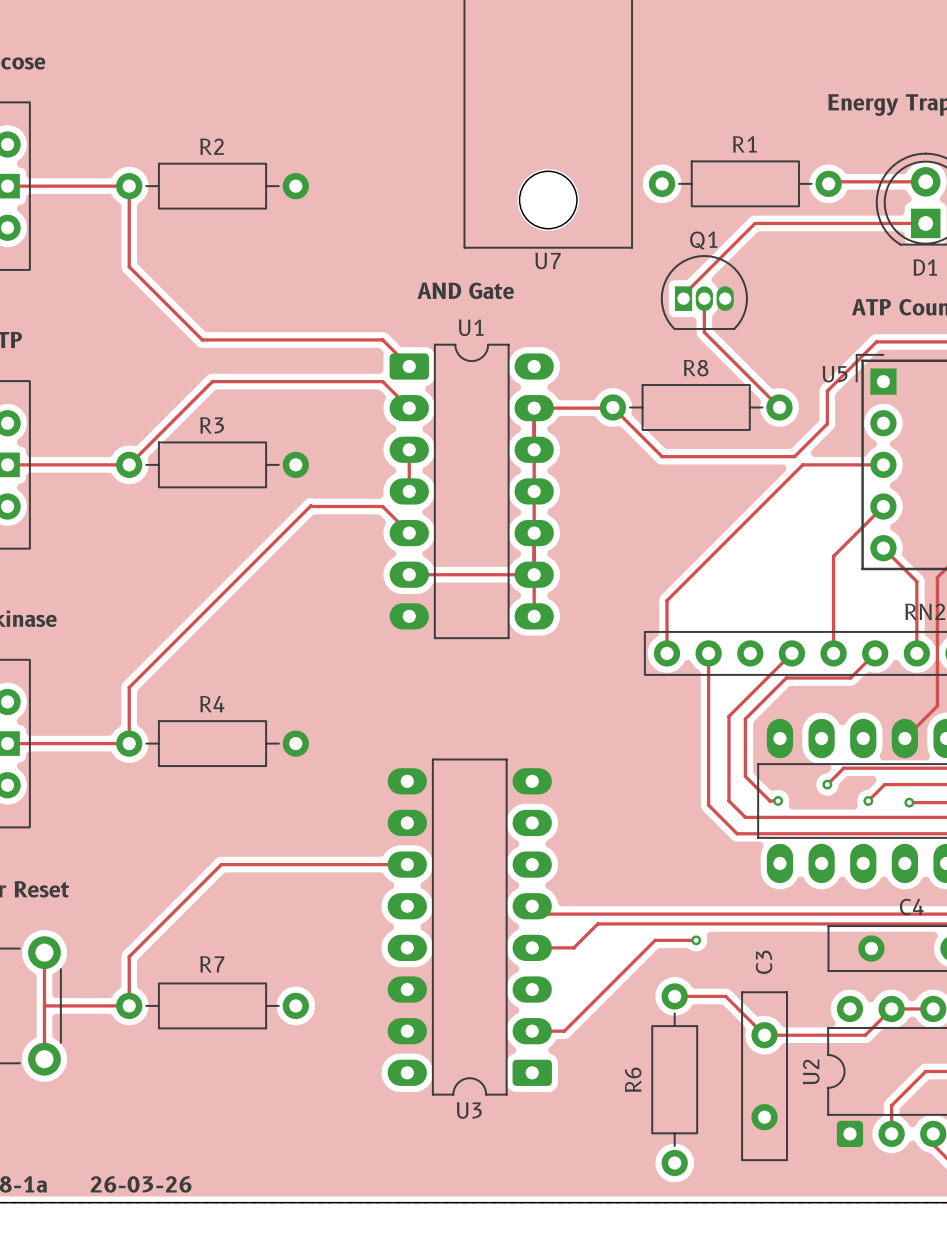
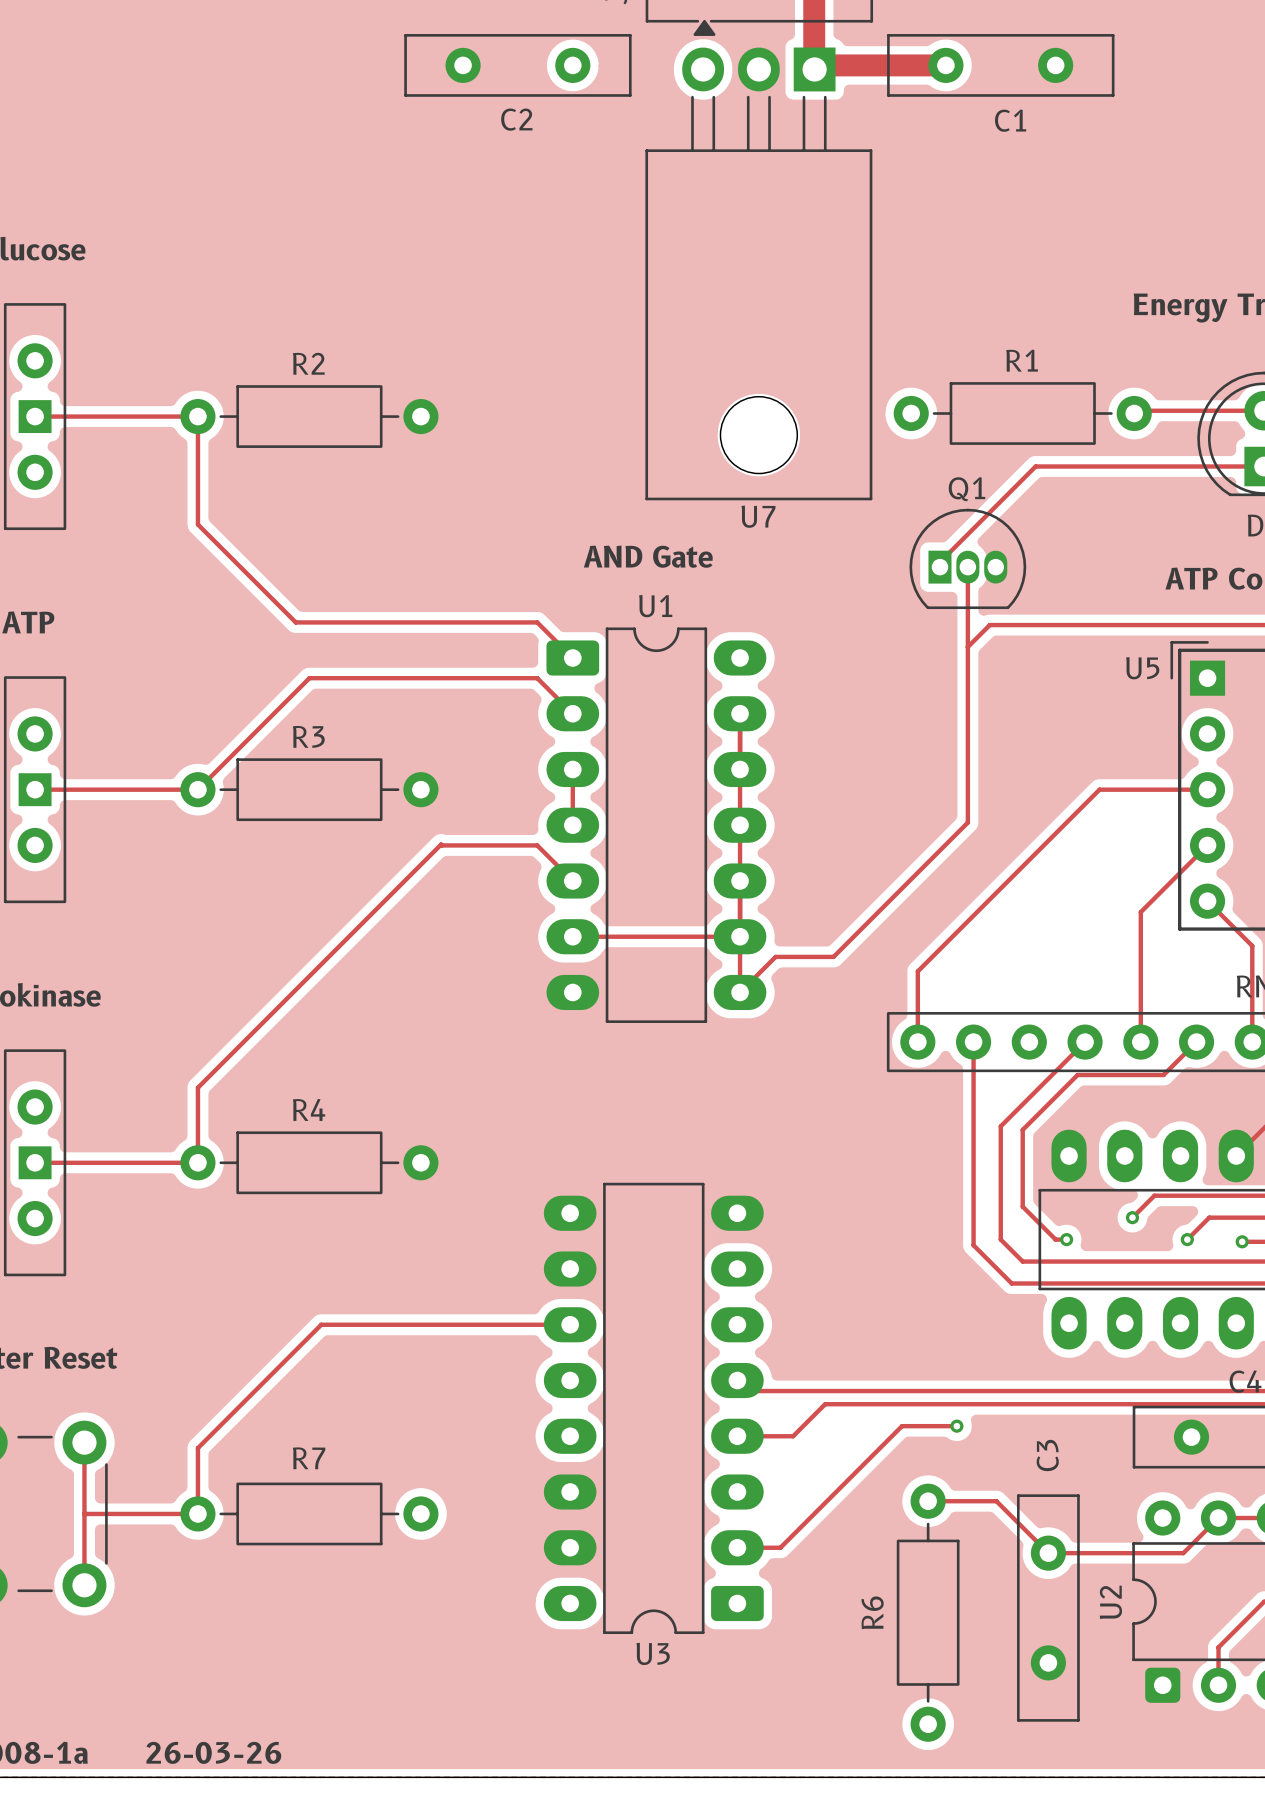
track: (704, 332) (779, 407) -> (967, 612) (967, 822) (833, 956) (775, 956) (740, 992)
track: (876, 341) (827, 391) (827, 423) (794, 456) (662, 456) (612, 407) (534, 408) -> (1198, 625) (989, 625) (967, 647)
R8: (696, 407) -> none

